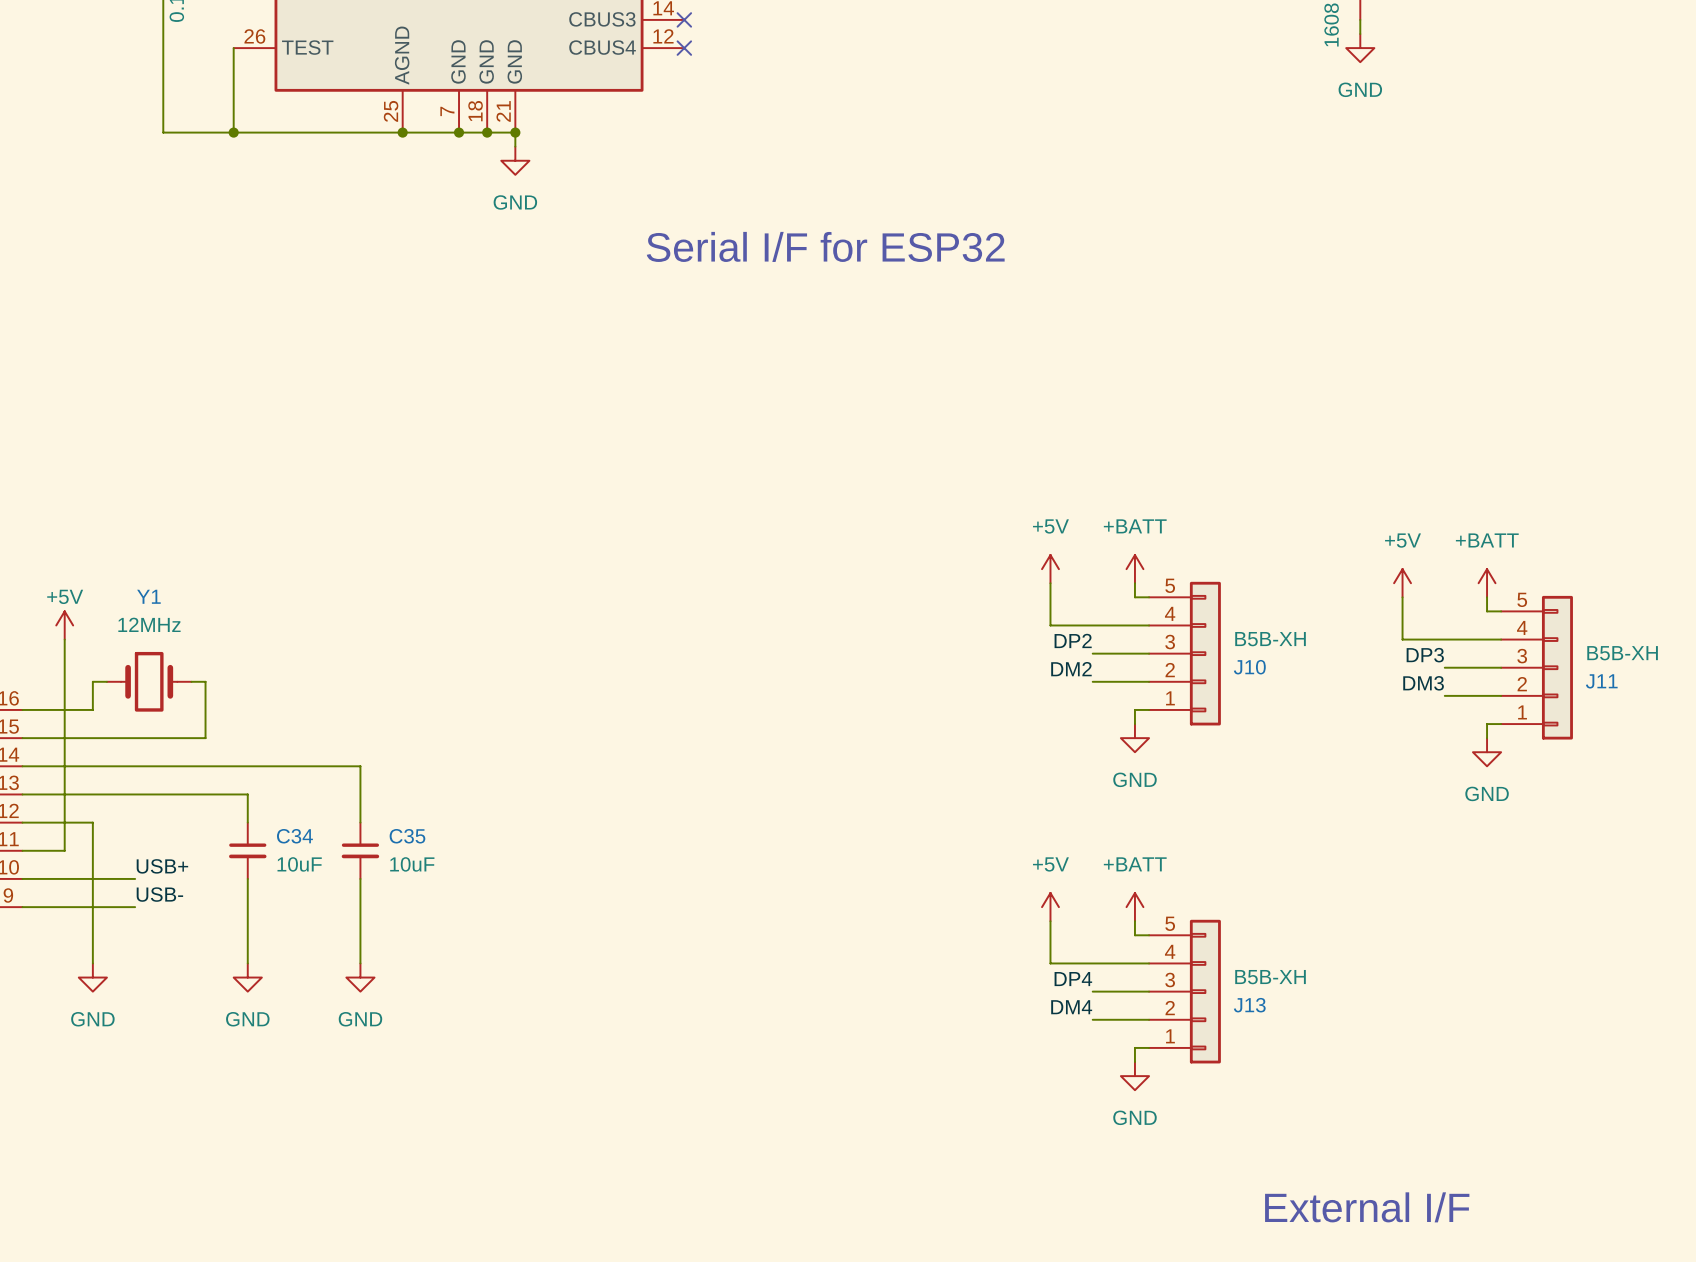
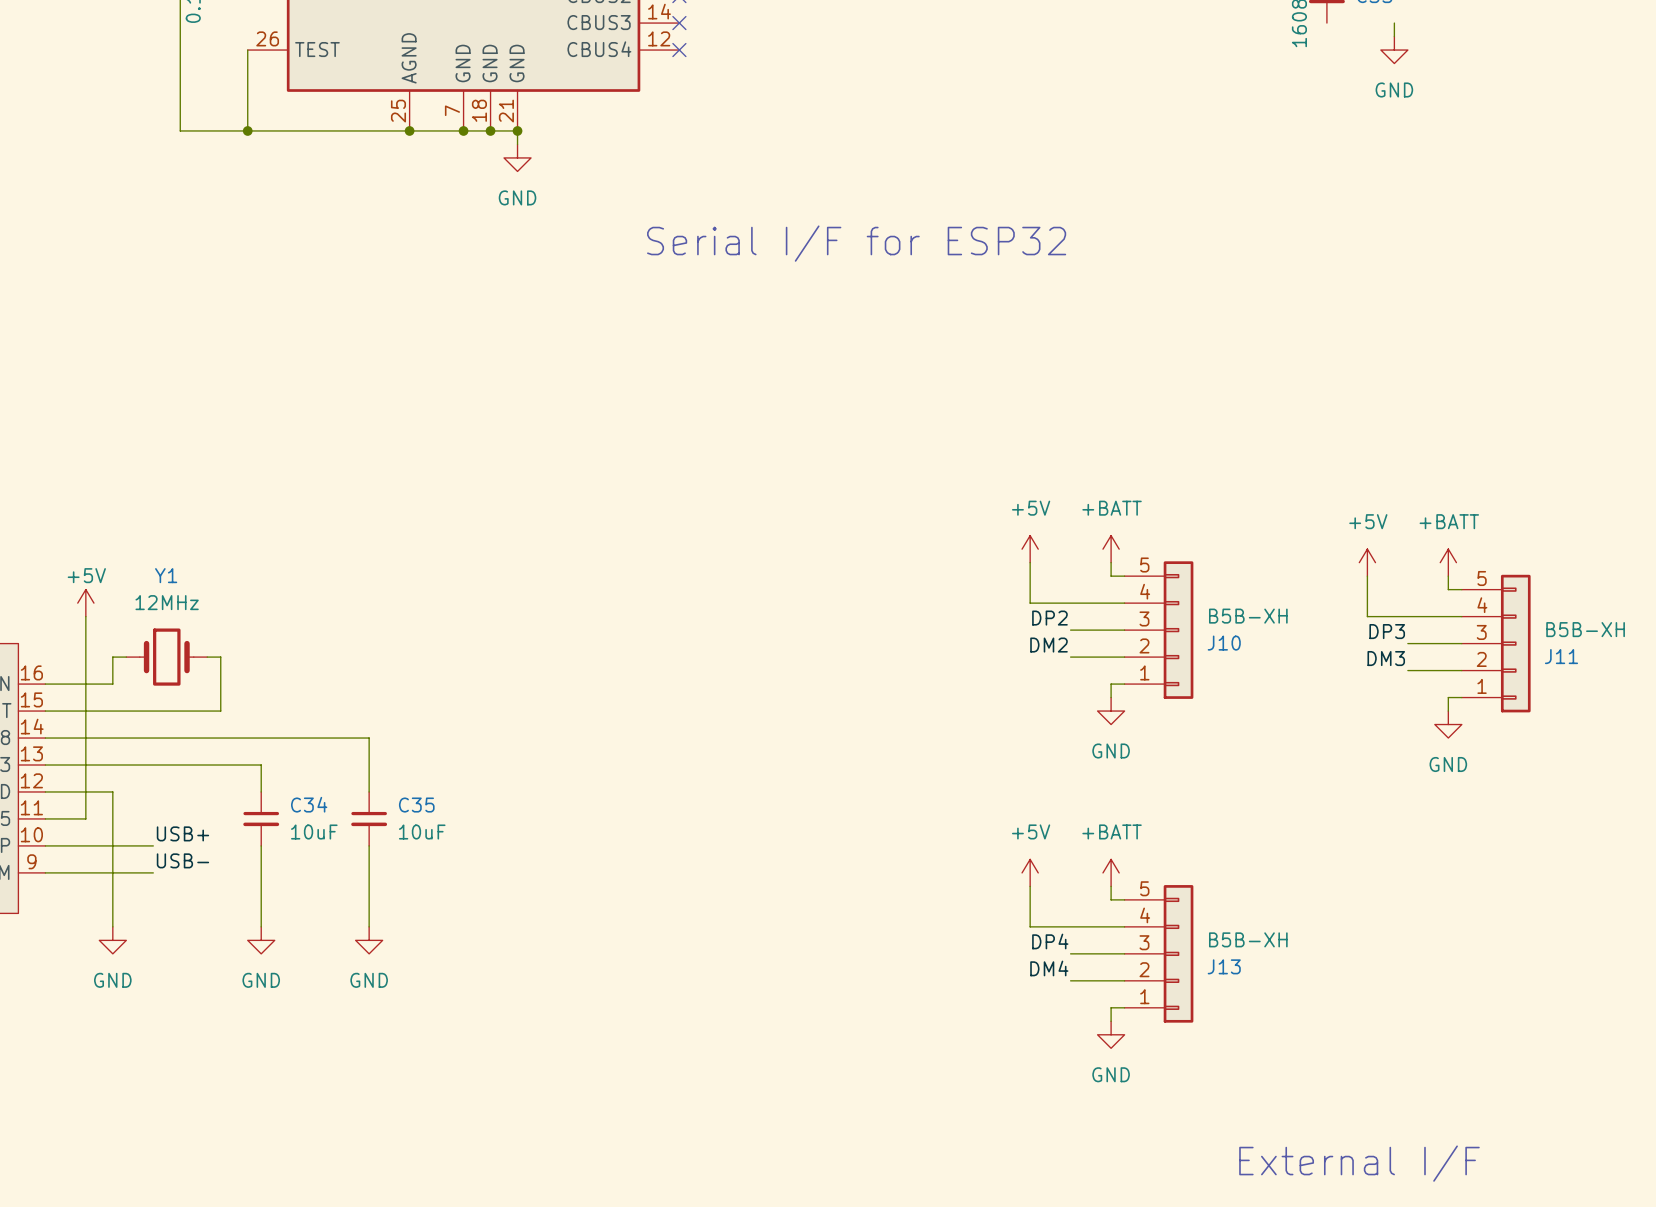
wire: (1360, 19) (1360, 34) -> (1394, 23) (1394, 36)
power symbol position: GND (1360, 48) -> GND (1394, 50)

